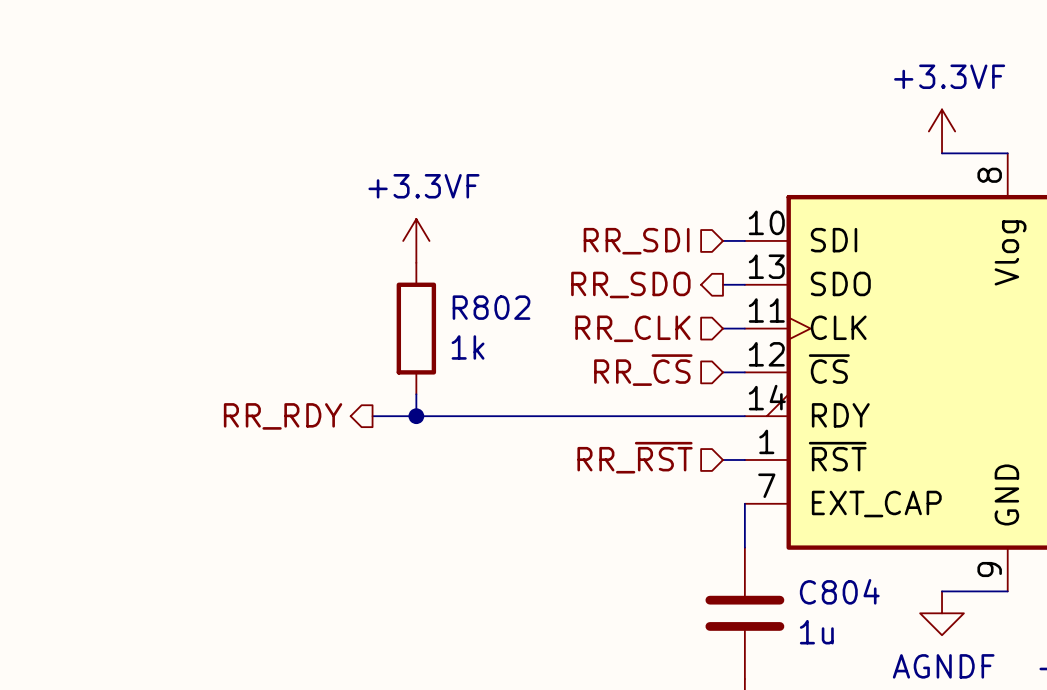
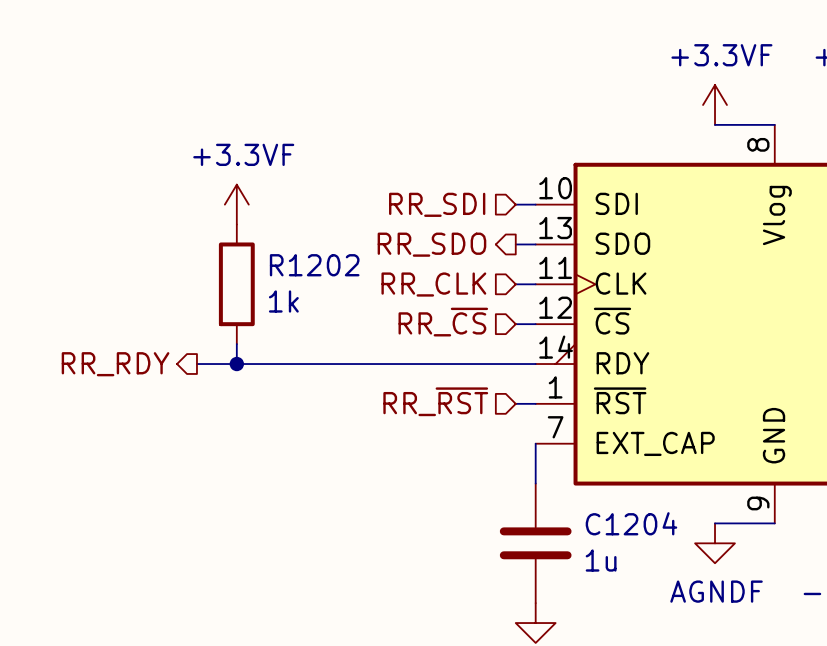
R802 name: R802 (491, 307) -> R1202 (314, 265)
C804 name: C804 (839, 591) -> C1204 (631, 523)

